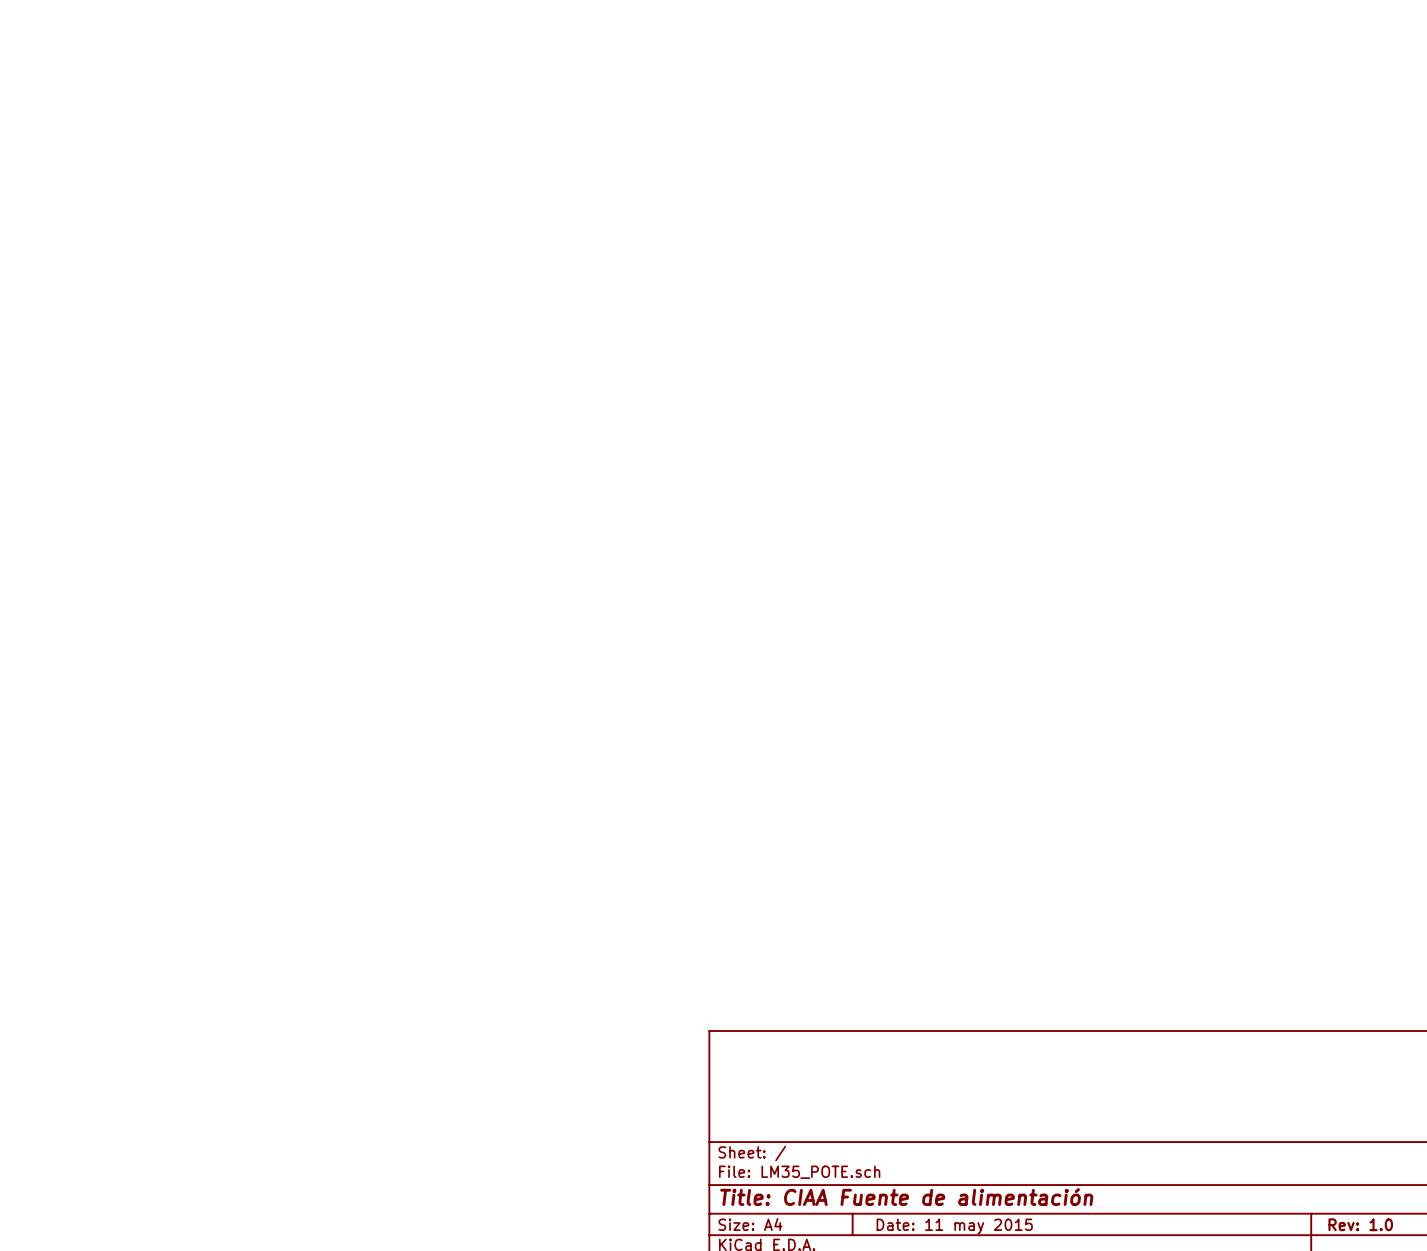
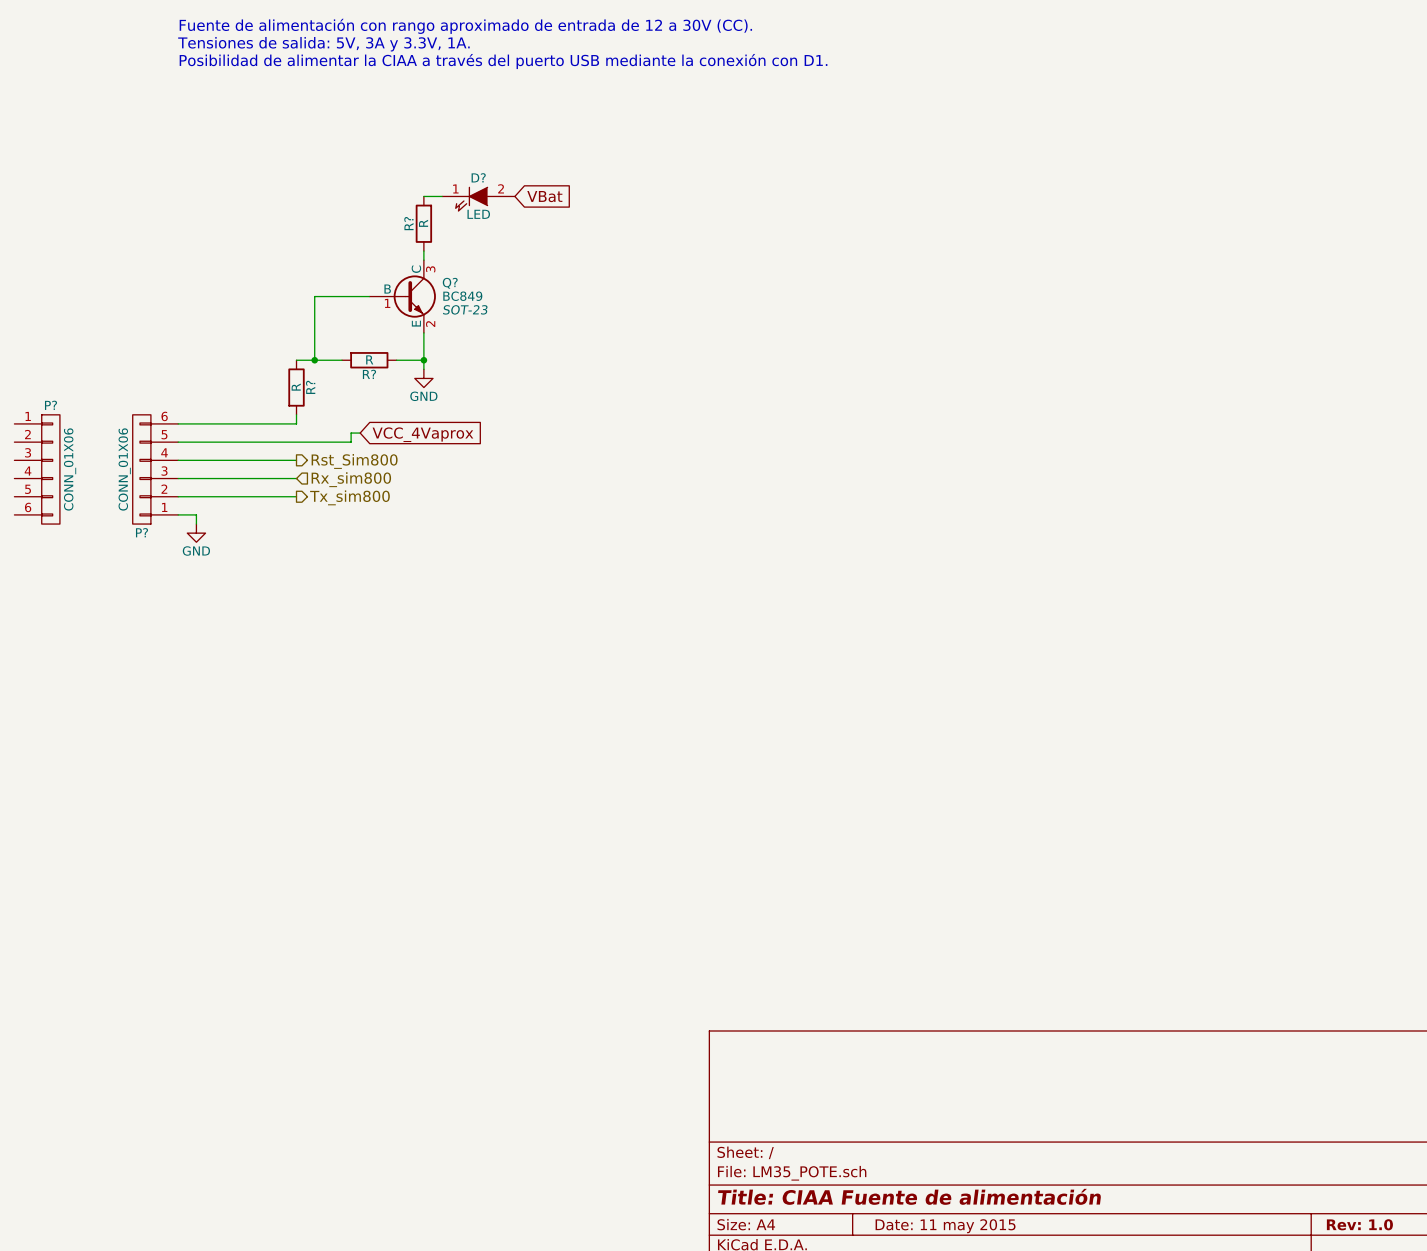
text: none -> Fuente de alimentación con rango aproximado de entrada de 12 a 30V (CC). (465, 26)
text: none -> Tensiones de salida: 5V, 3A y 3.3V, 1A. (323, 44)
text: none -> Posibilidad de alimentar la CIAA a través del puerto USB mediante la conexión con D1. (503, 61)
wire: none -> (423, 196) (442, 196)
global label: none -> VBat (544, 196)
D?: none -> LED (478, 199)
R?: none -> R (423, 223)
wire: none -> (423, 251) (423, 260)
wire: none -> (369, 296) (314, 296) (314, 360)
Q?: none -> BC849 (402, 296)
wire: none -> (423, 332) (423, 369)
wire: none -> (296, 360) (342, 360)
junction: none -> (314, 360)
R?: none -> R (369, 360)
wire: none -> (396, 360) (423, 360)
junction: none -> (423, 360)
power symbol: none -> GND (423, 378)
R?: none -> R (296, 387)
wire: none -> (296, 414) (296, 423) (178, 423)
wire: none -> (360, 433) (351, 433) (351, 442) (178, 442)
global label: none -> VCC_4Vaprox (422, 434)
wire: none -> (178, 460) (296, 460)
hierarchical label: none -> Rst_Sim800 (354, 461)
P?: none -> CONN_01X06 (37, 469)
P?: none -> CONN_01X06 (155, 469)
wire: none -> (178, 478) (296, 478)
hierarchical label: none -> Rx_sim800 (351, 479)
wire: none -> (178, 496) (296, 496)
hierarchical label: none -> Tx_sim800 (349, 497)
wire: none -> (178, 514) (196, 514) (196, 524)
power symbol: none -> GND (196, 533)

